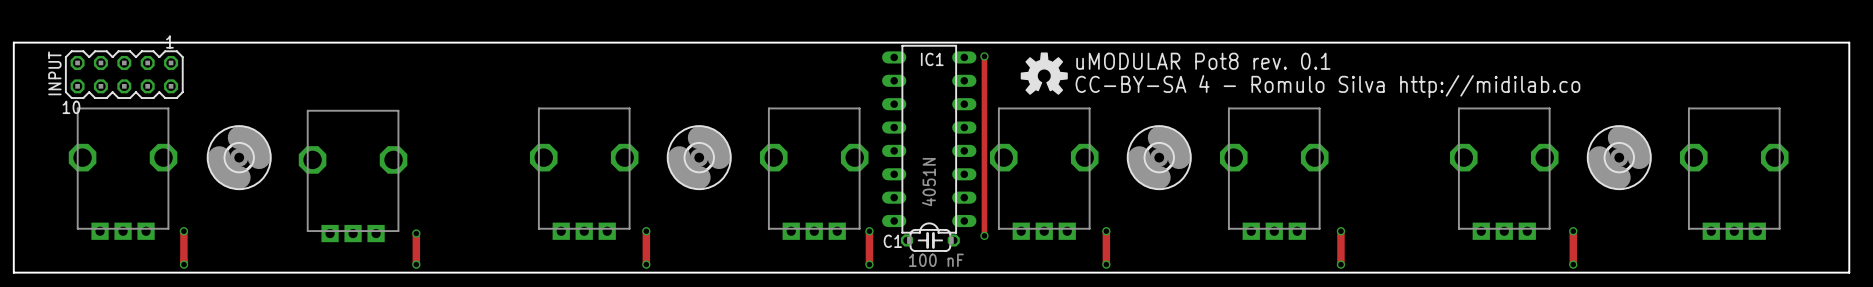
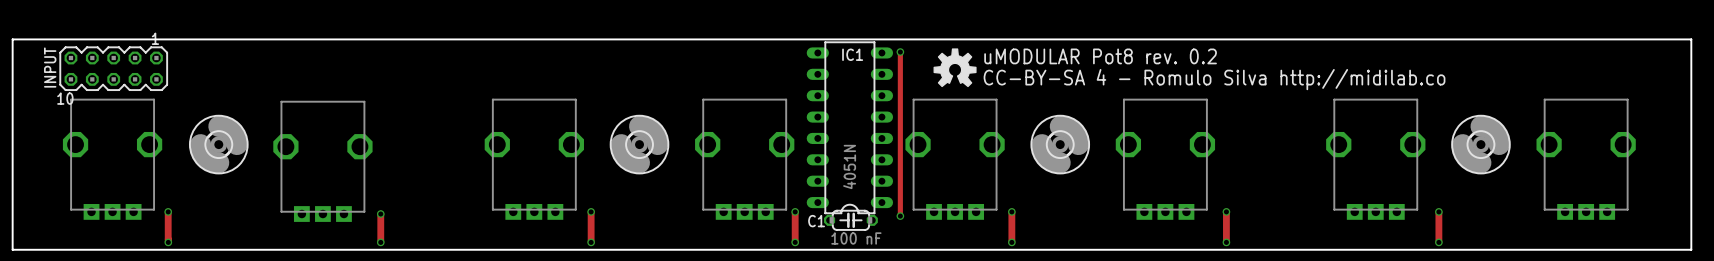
text: uMODULAR Pot8 rev. 0.1 (1203, 61) -> uMODULAR Pot8 rev. 0.2 (1100, 56)

